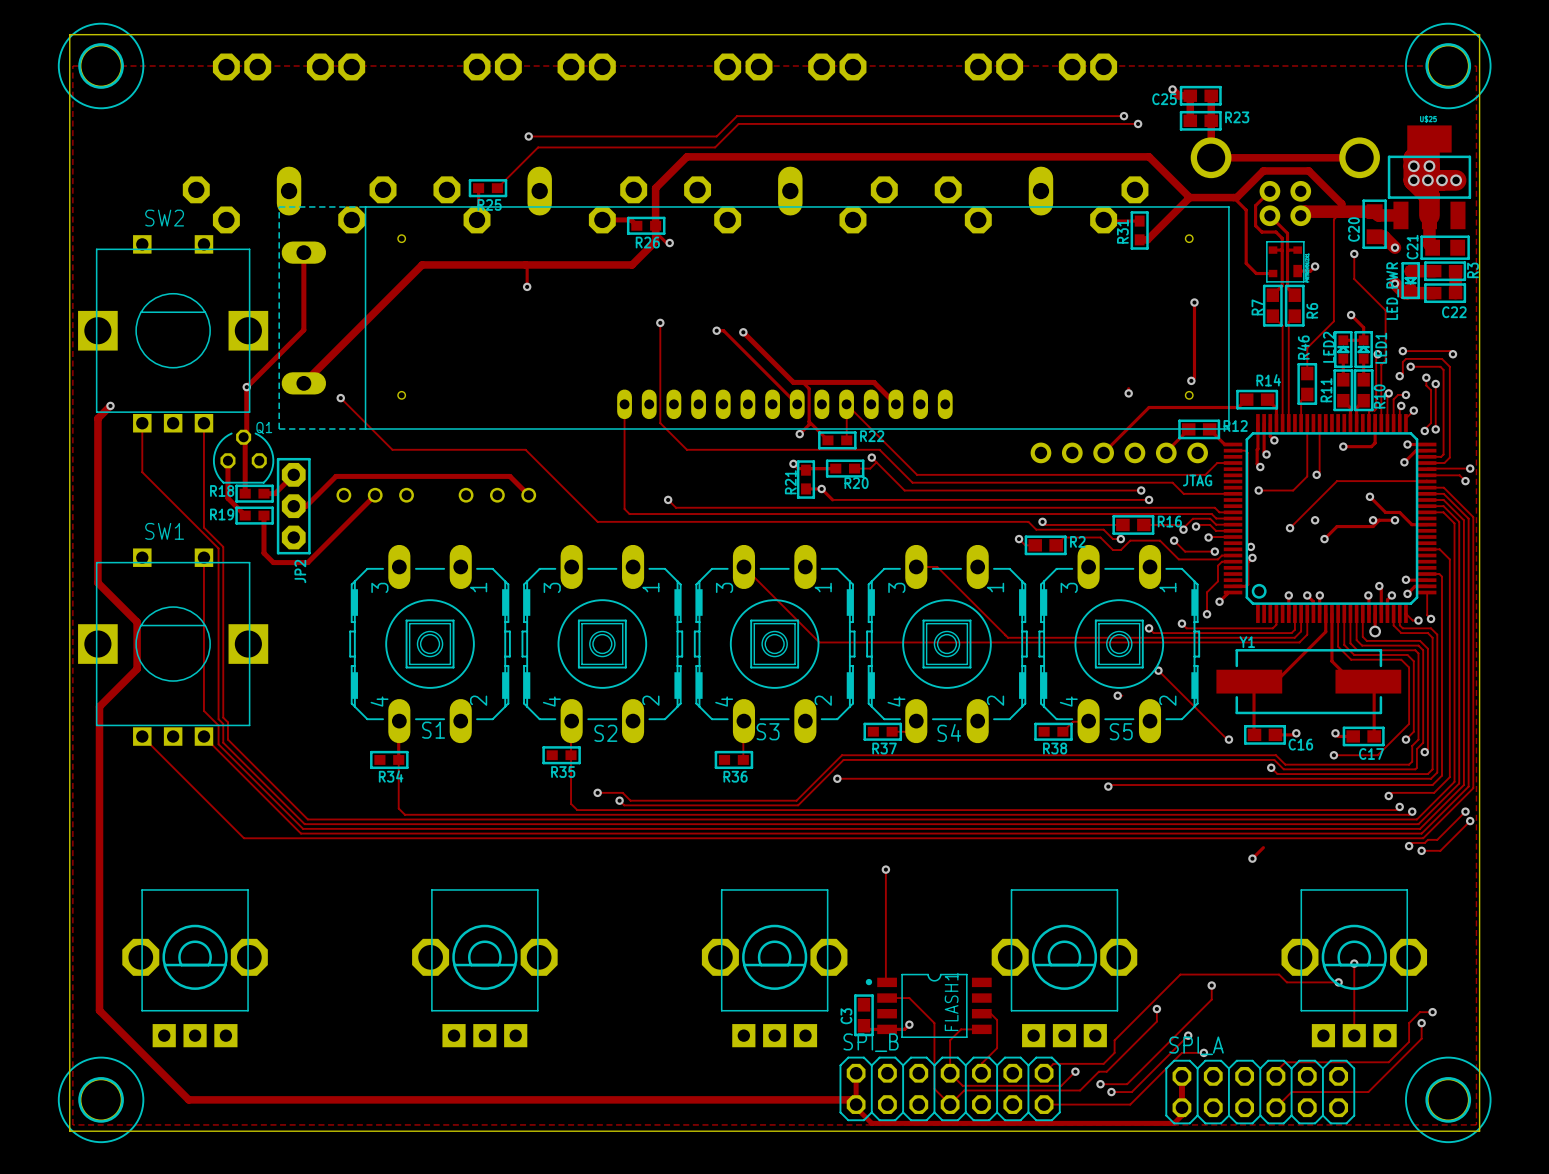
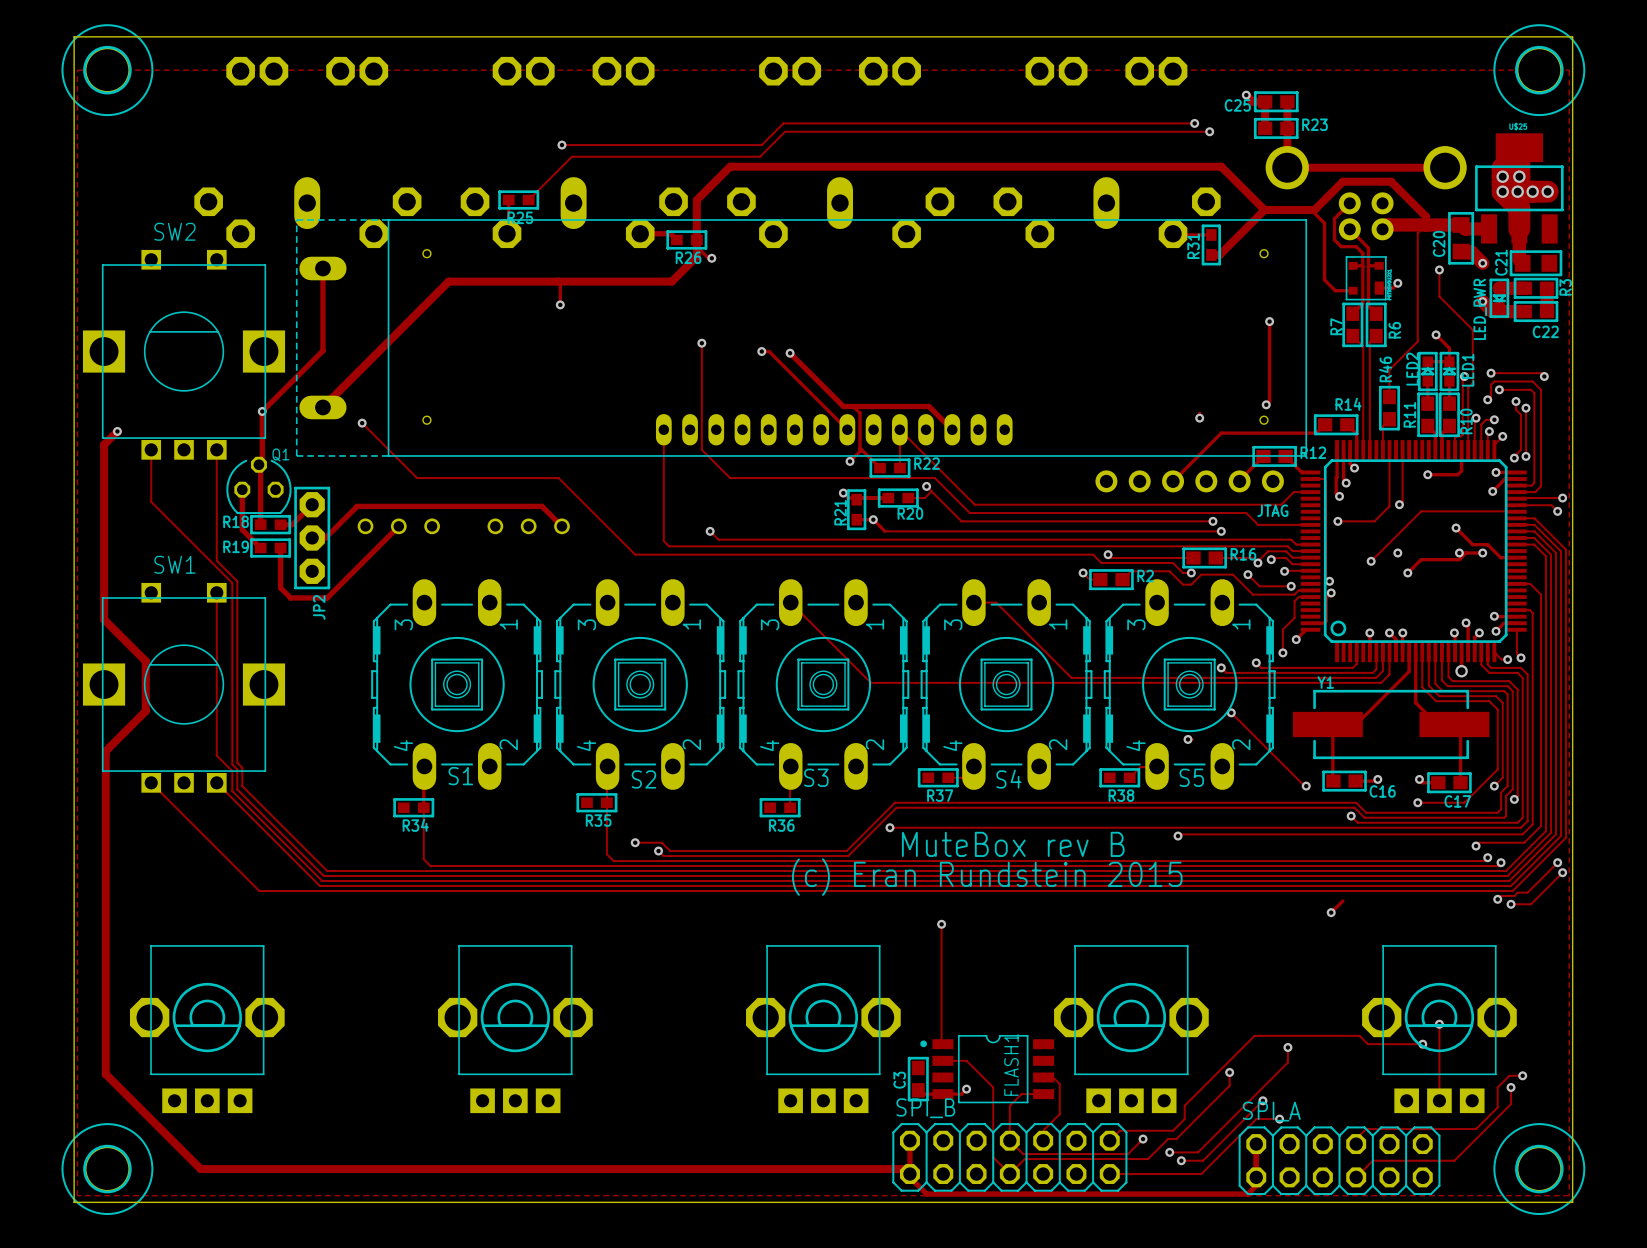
text: none -> MuteBox rev B (1013, 844)
text: none -> (c) Eran Rundstein 2015 (987, 877)

